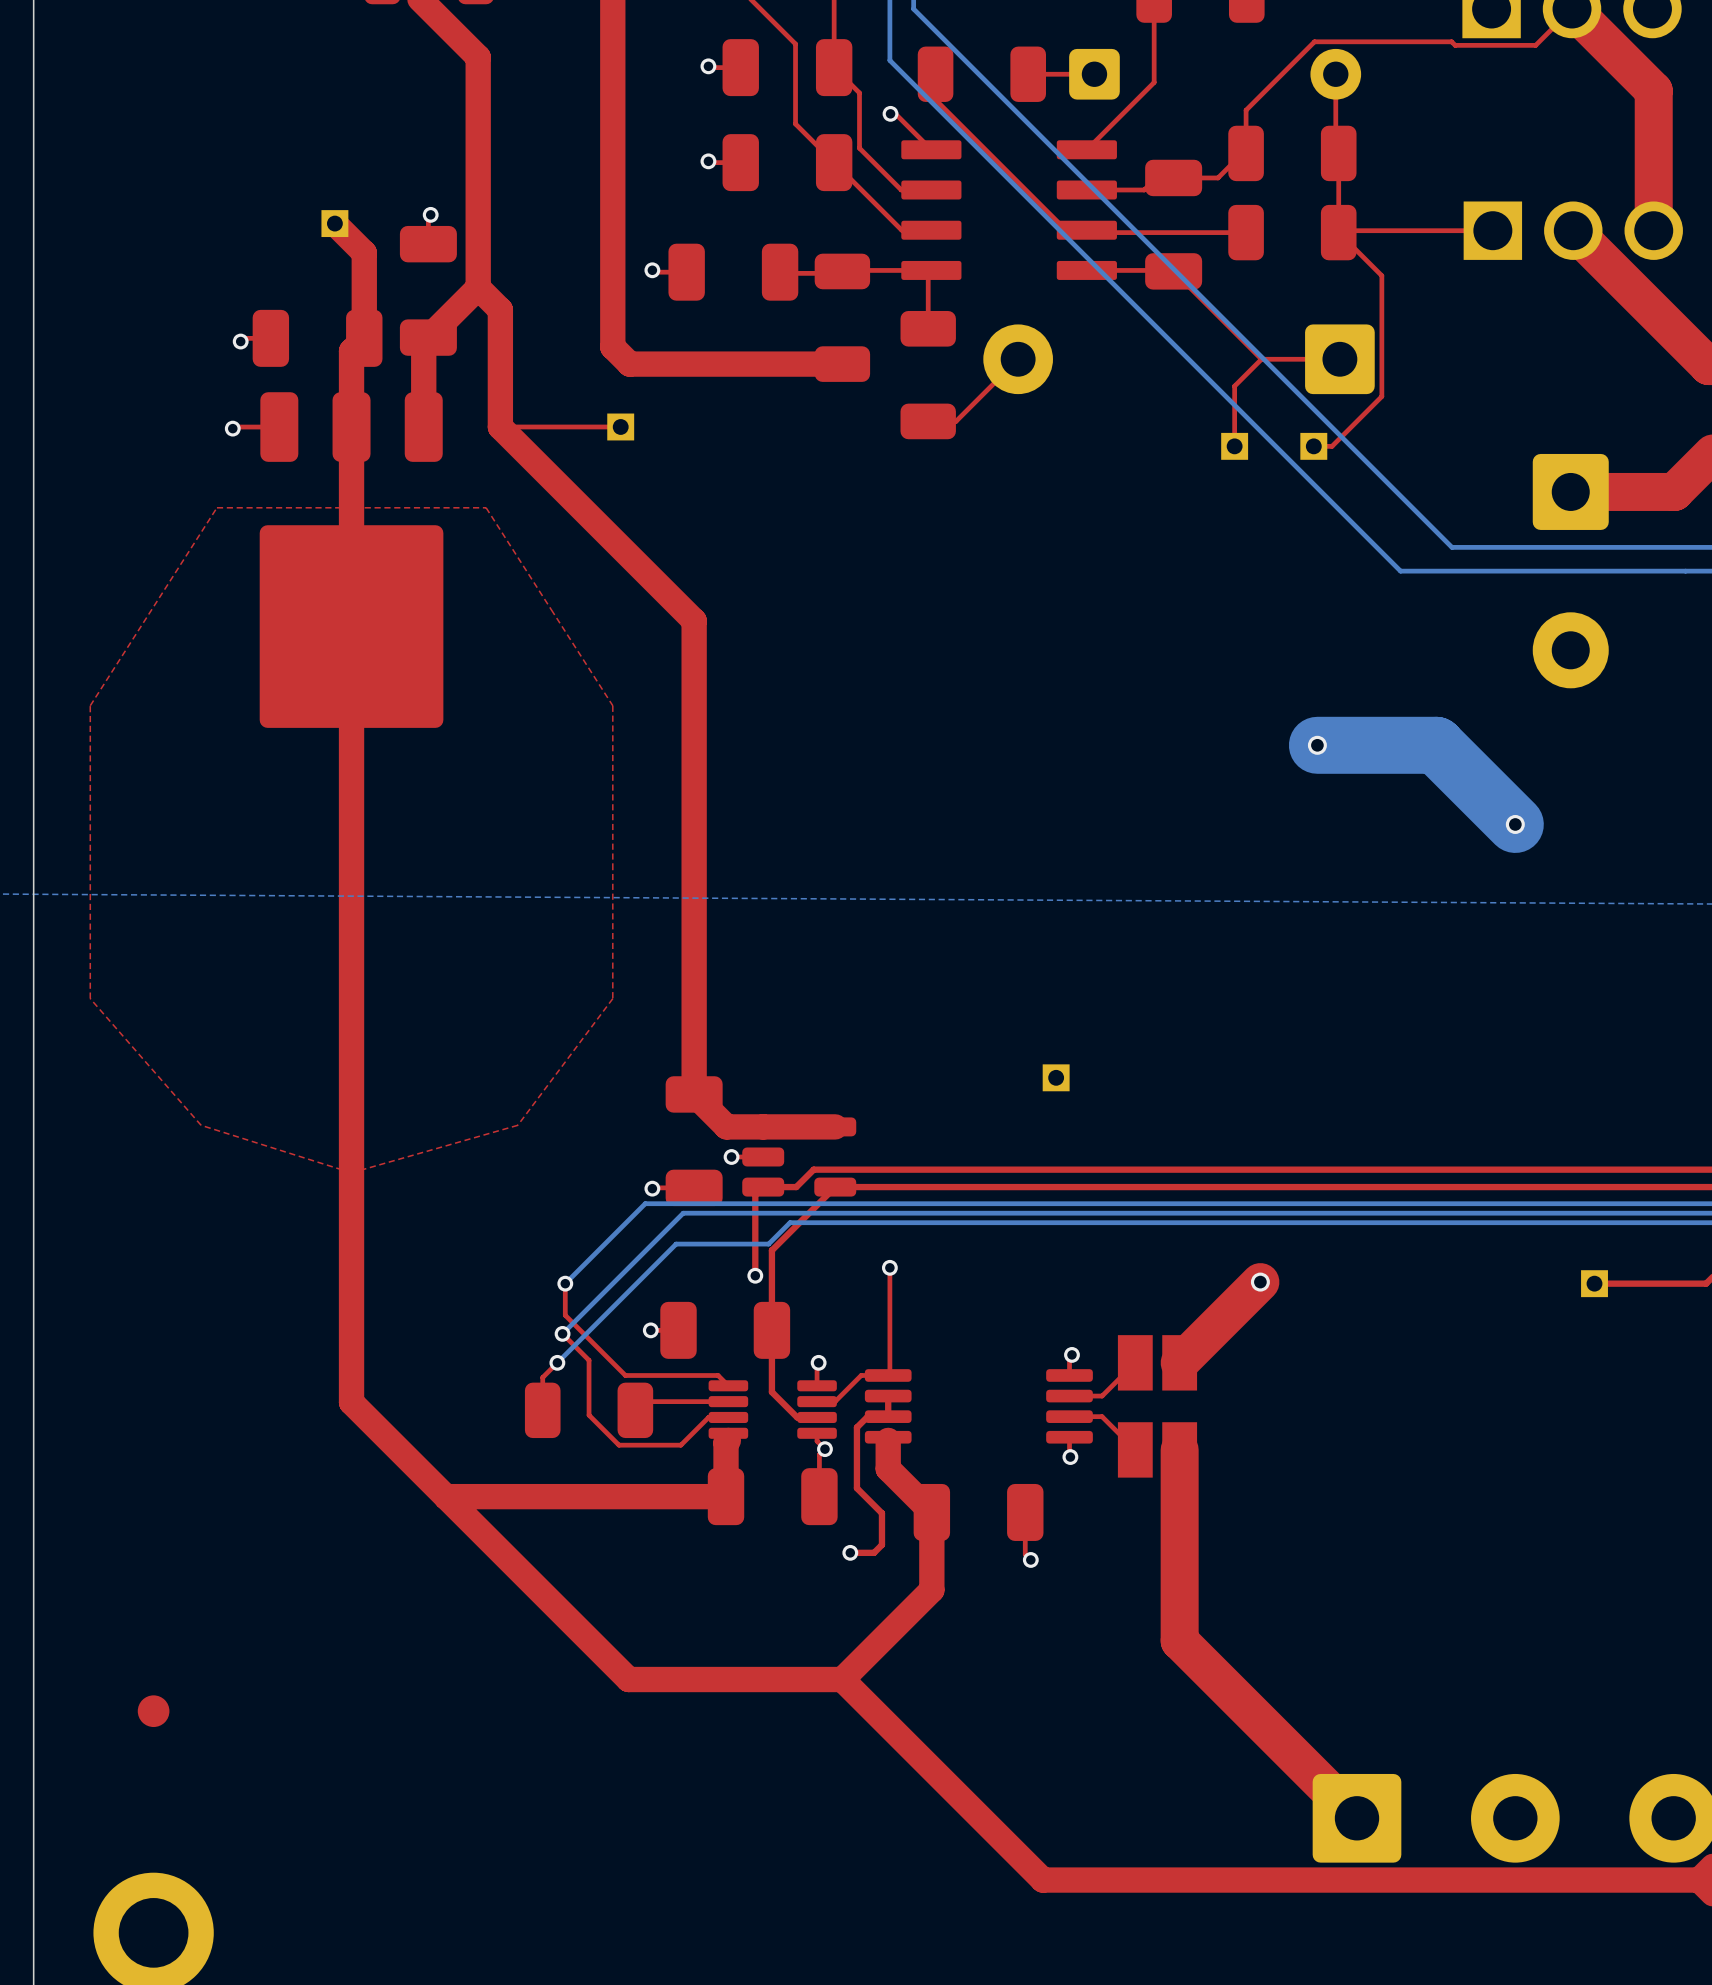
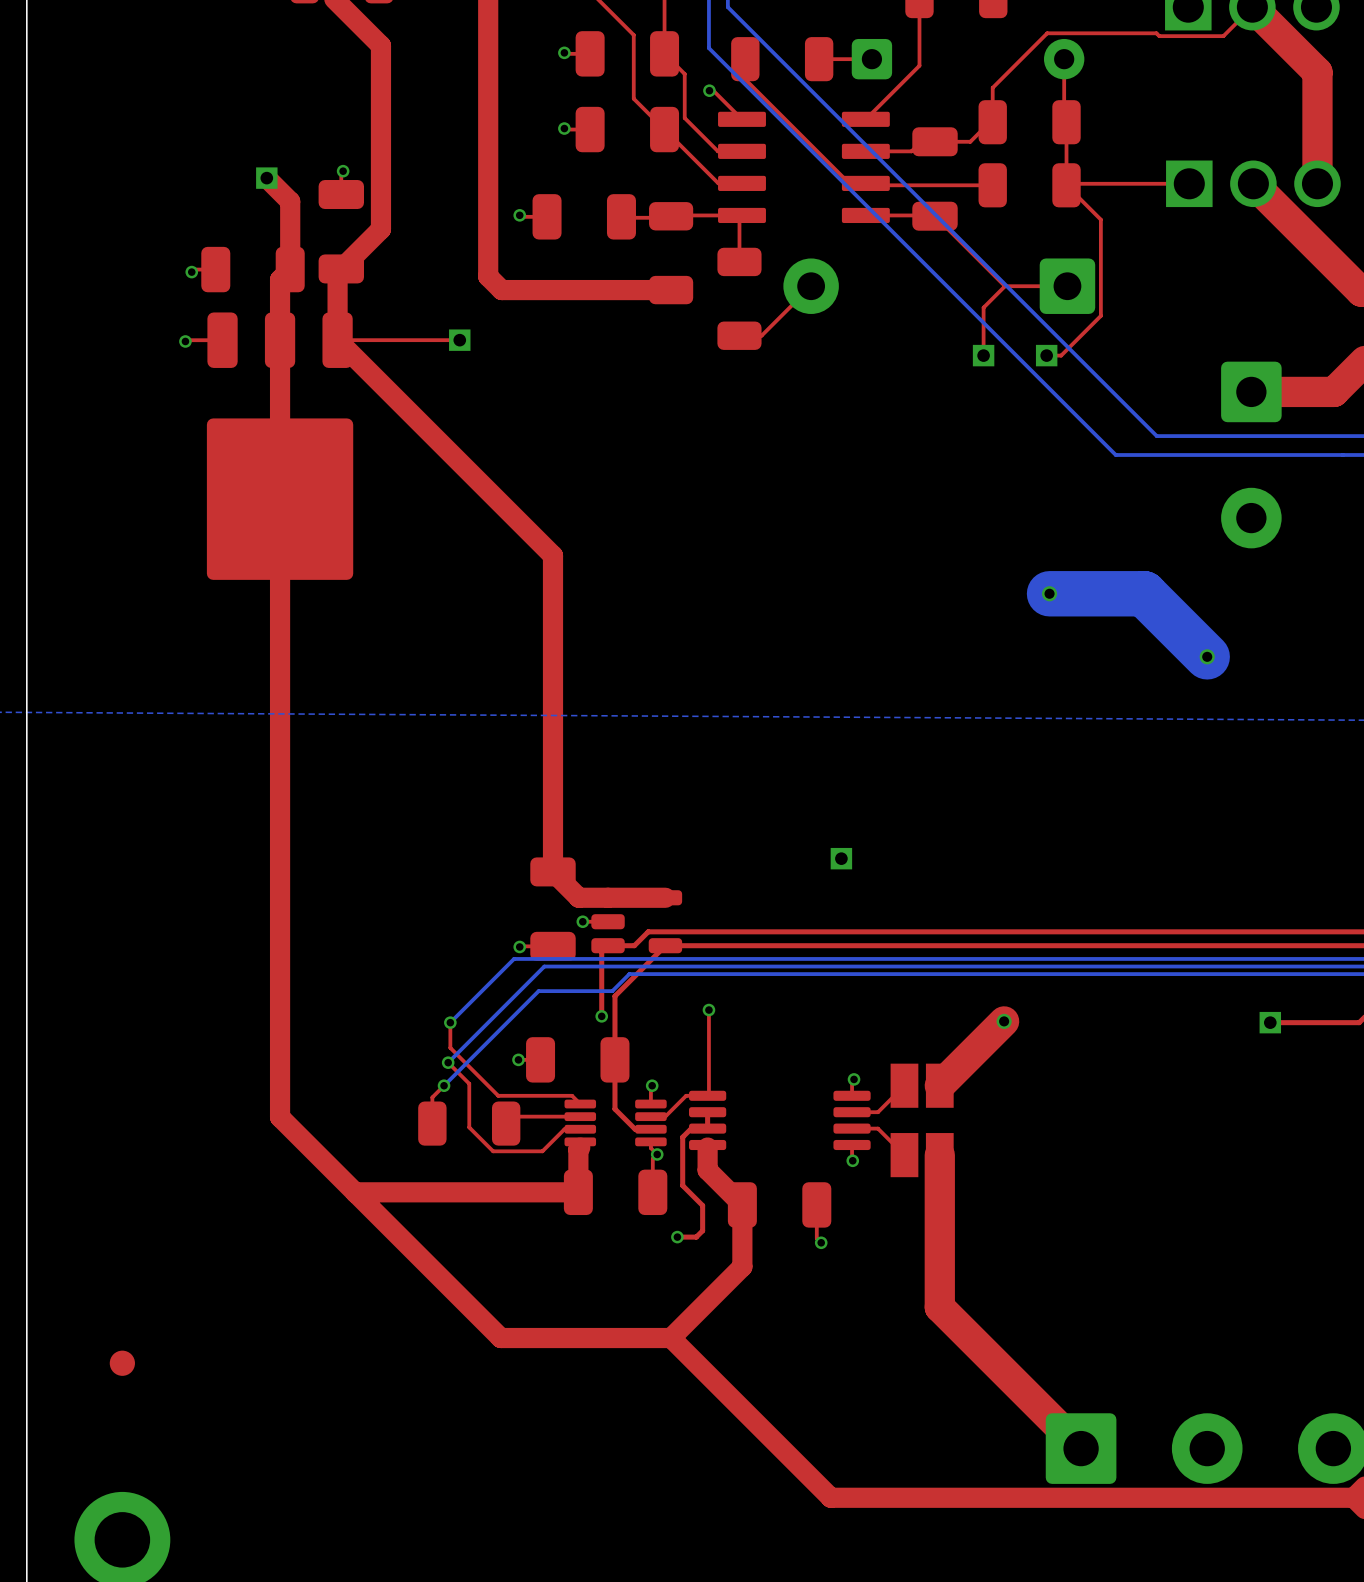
top track: (478, 287) (500, 309) (500, 427) (694, 620) (694, 697) -> (398, 340) (337, 340) (553, 555)
top track: (620, 426) (577, 426) -> none
part position: (620, 426) -> (459, 340)
top zone outline: (486, 507) (612, 705) (612, 998) (517, 1125) (351, 1172) (201, 1125) (90, 998) (90, 705) (216, 507) (486, 507) -> none

